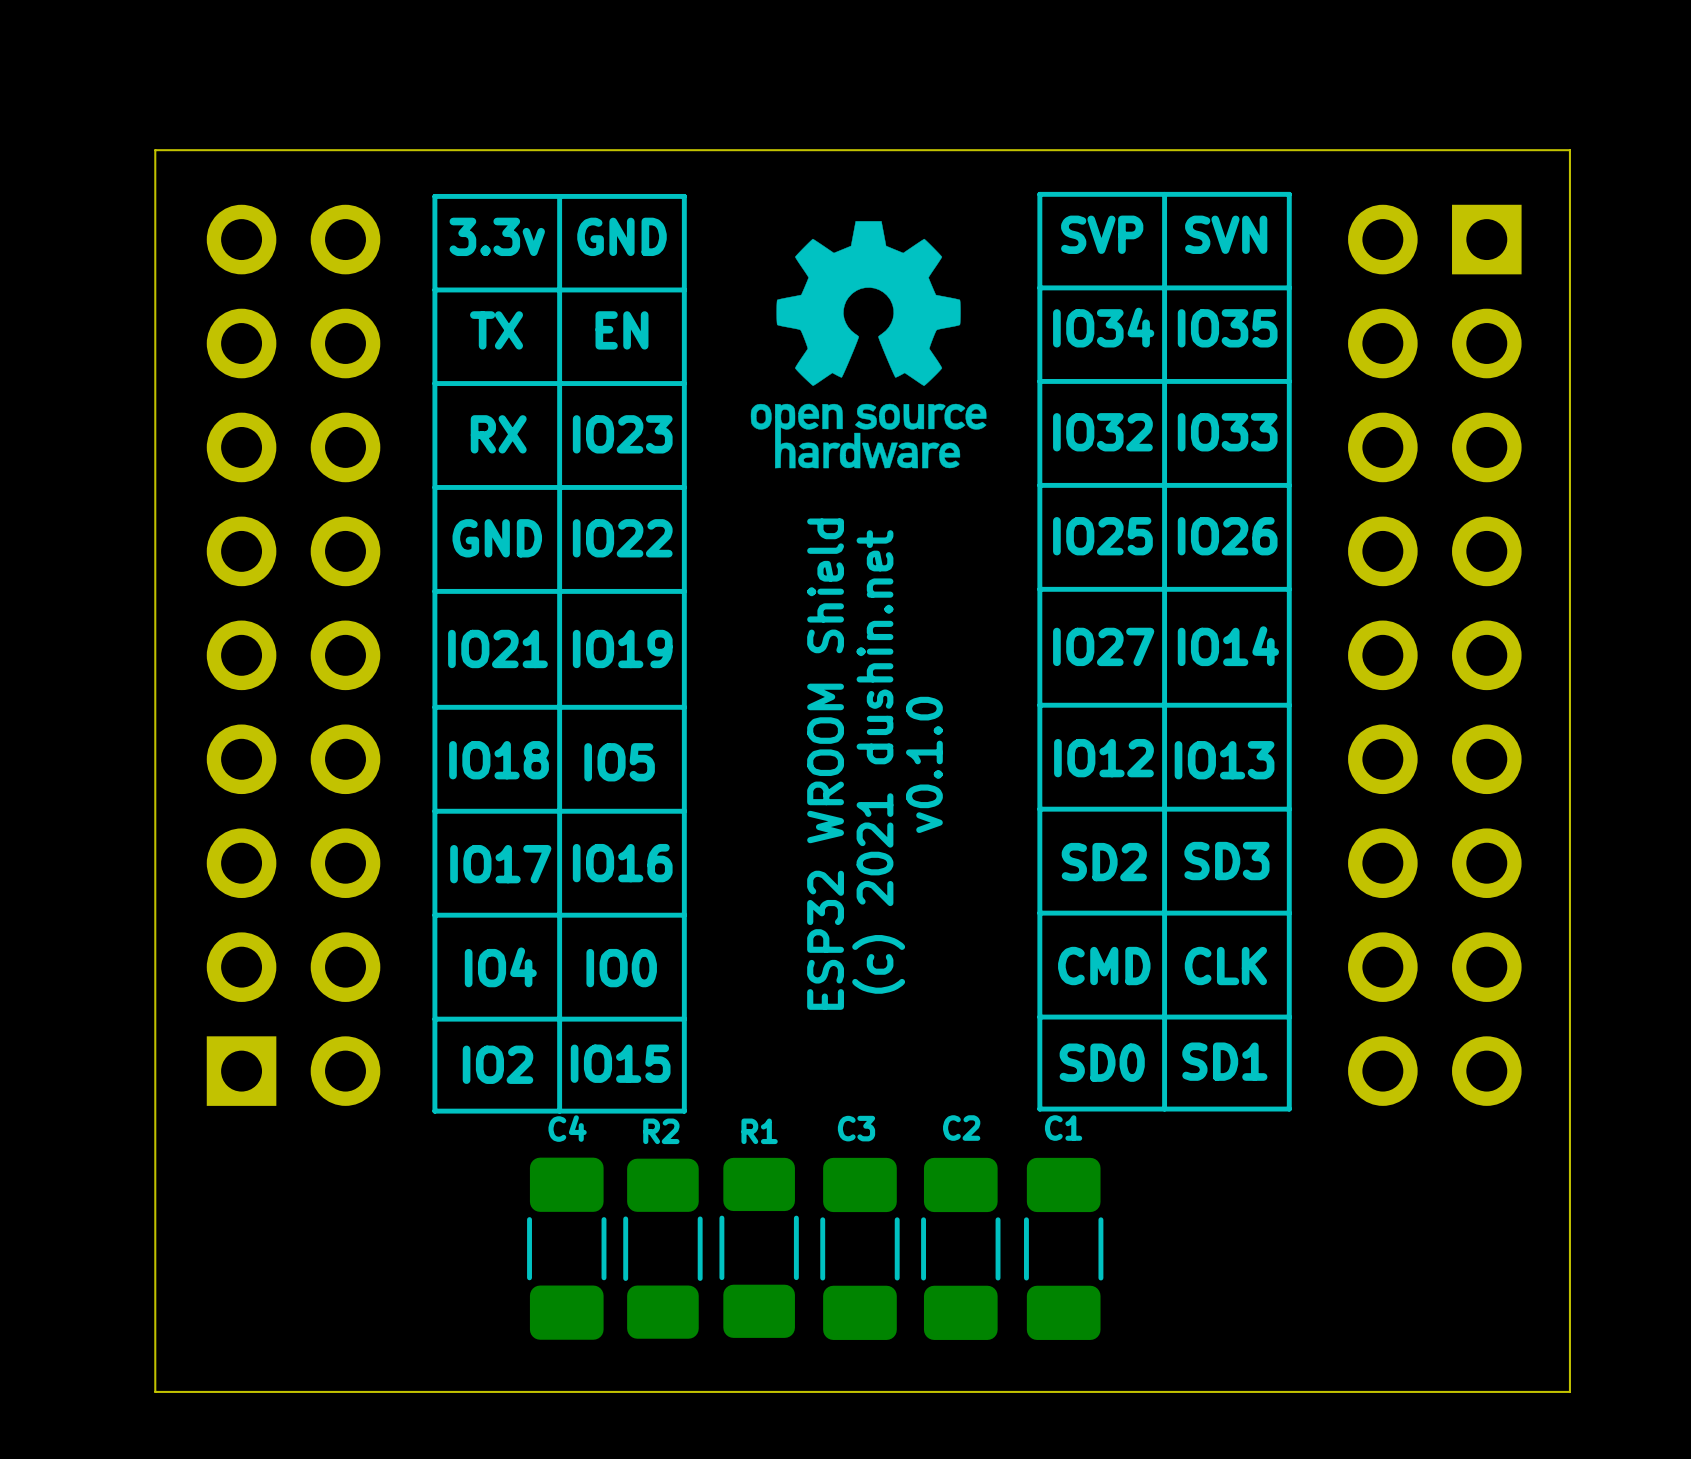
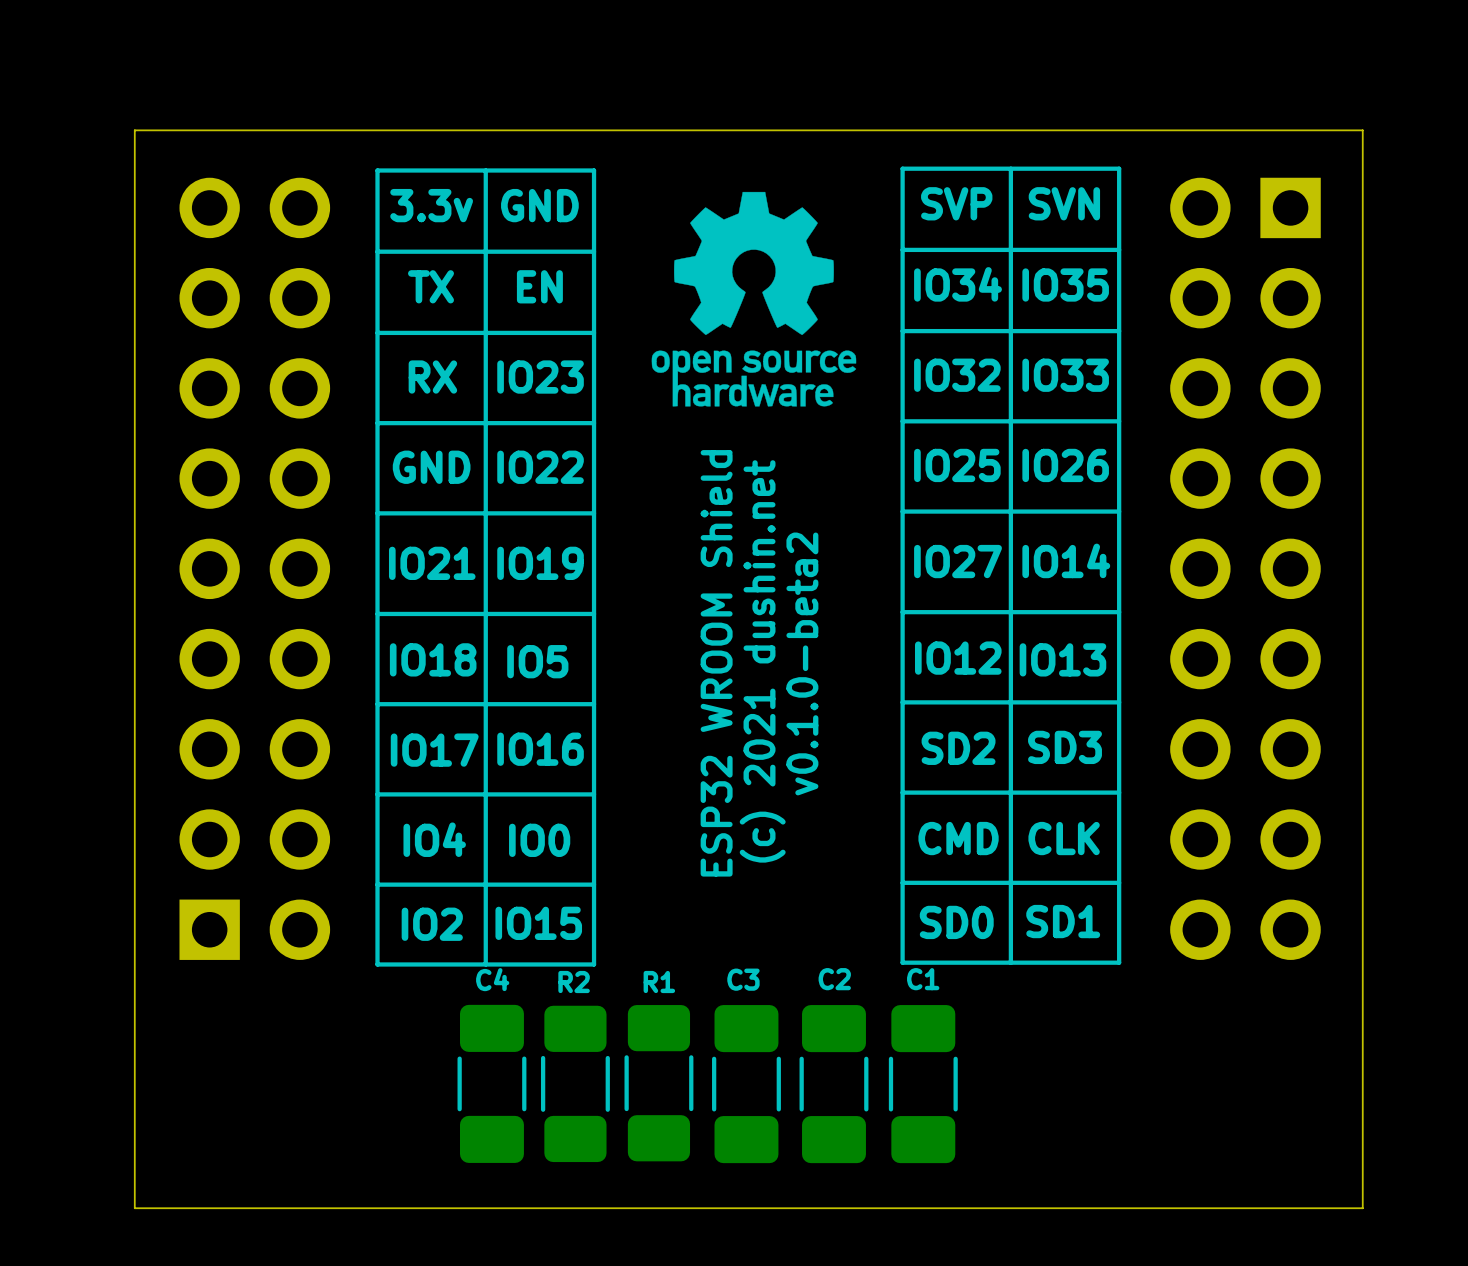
text: v0.1.0 (924, 764) -> v0.1.0-beta2 (802, 663)

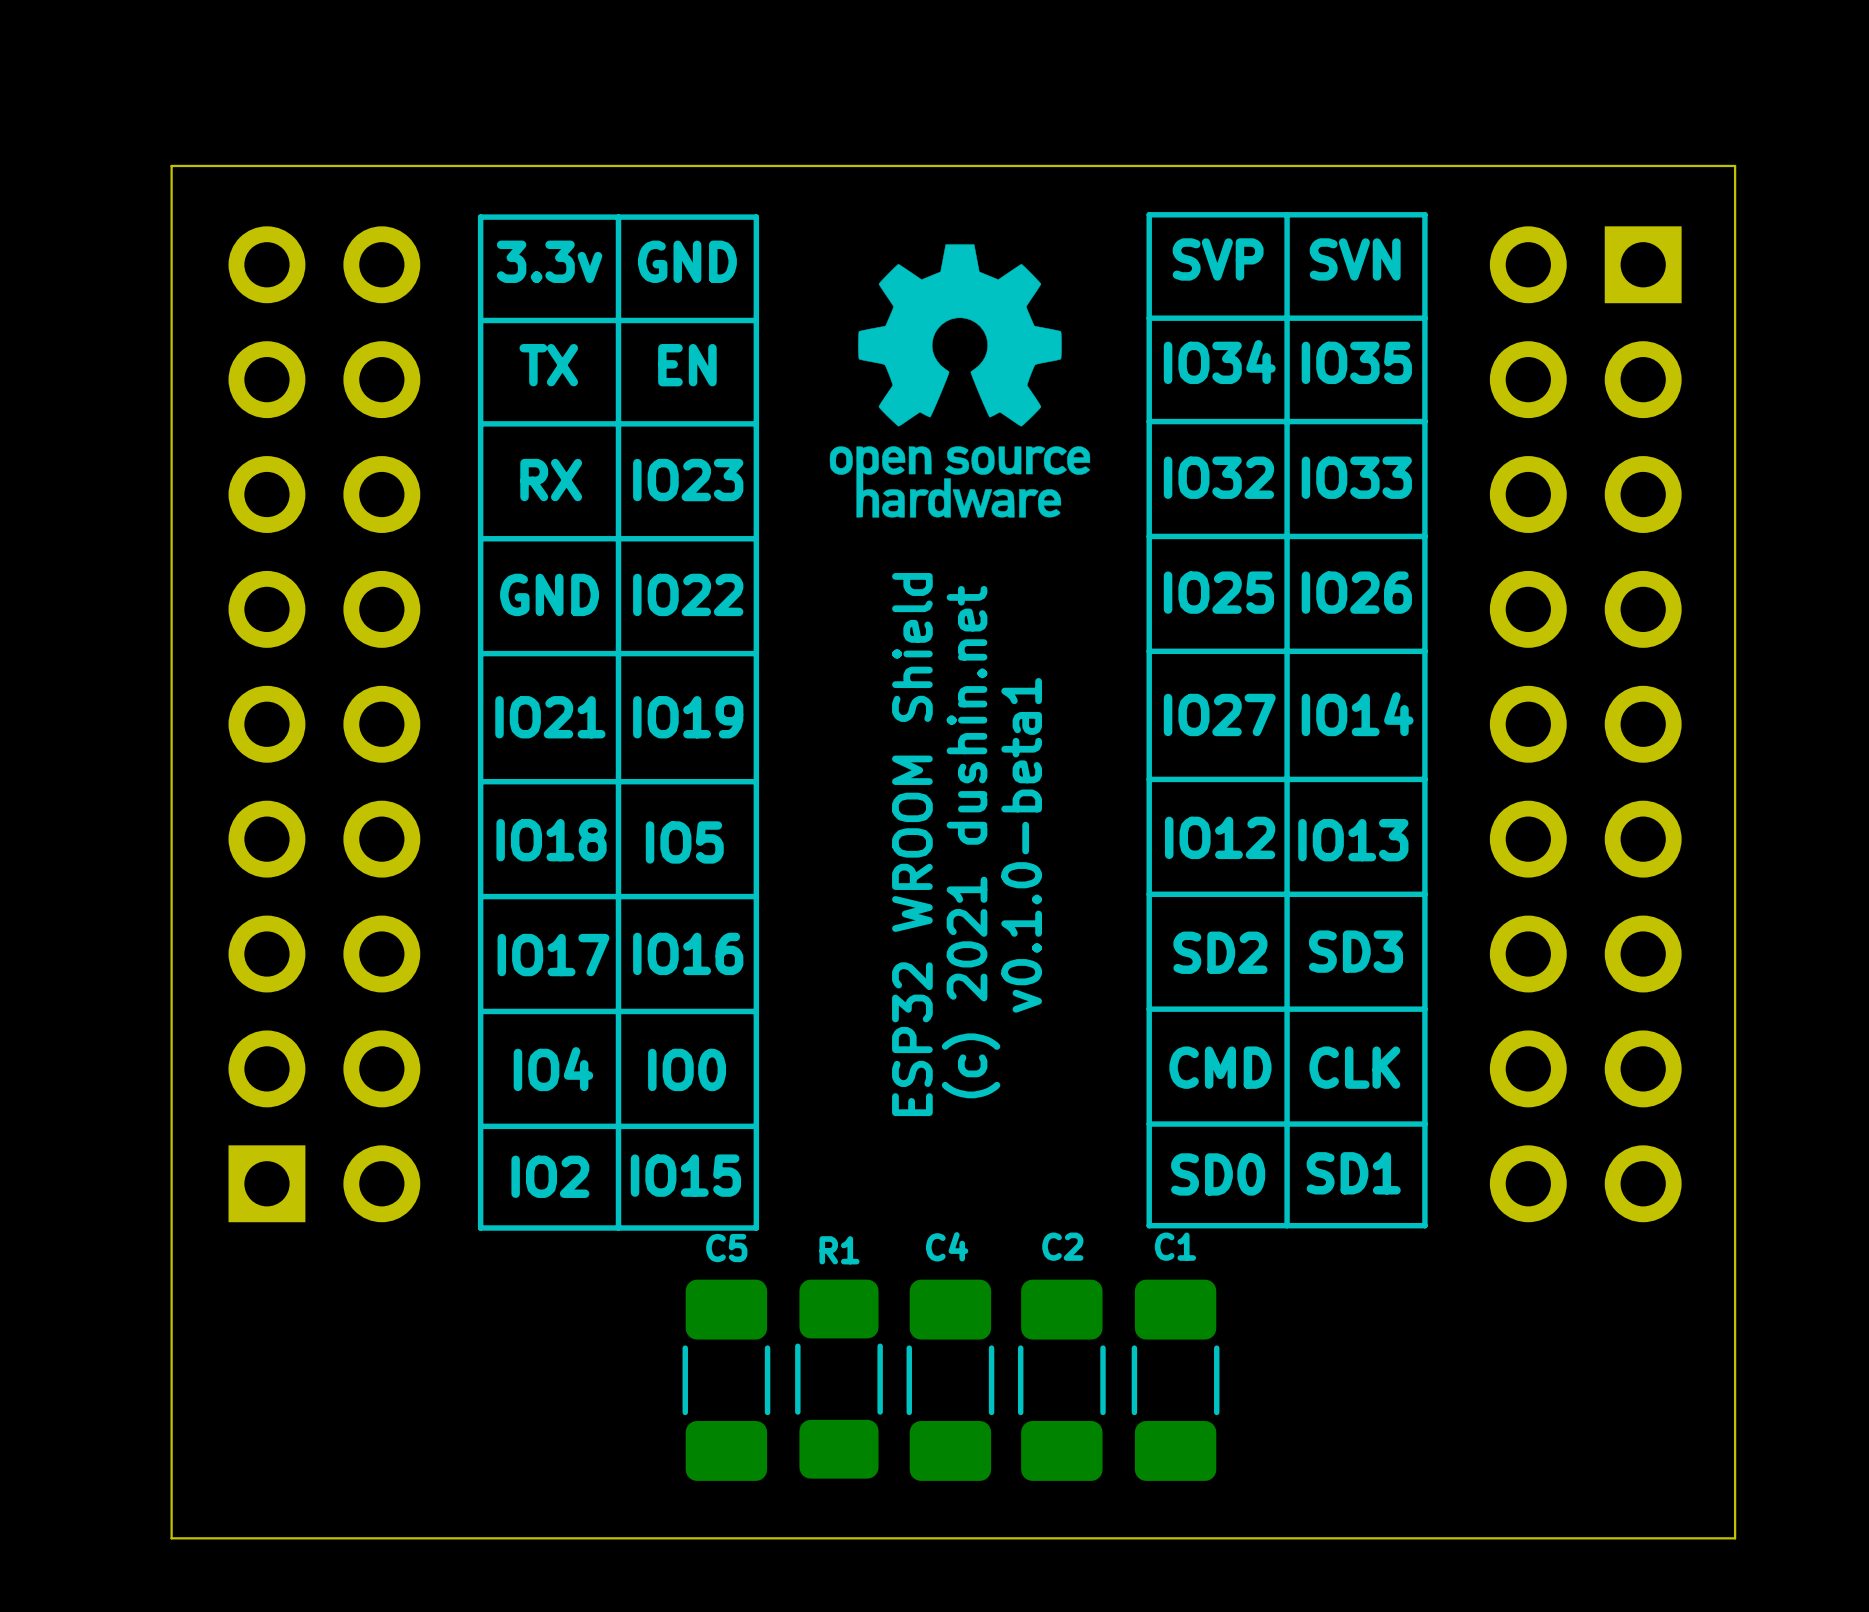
text: v0.1.0-beta2 (802, 663) -> v0.1.0-beta1 (1021, 845)
C3 name: C3 (743, 979) -> C4 (947, 1246)
C4: (491, 1083) -> none
R2: (575, 1083) -> none
C5: none -> (726, 1380)

